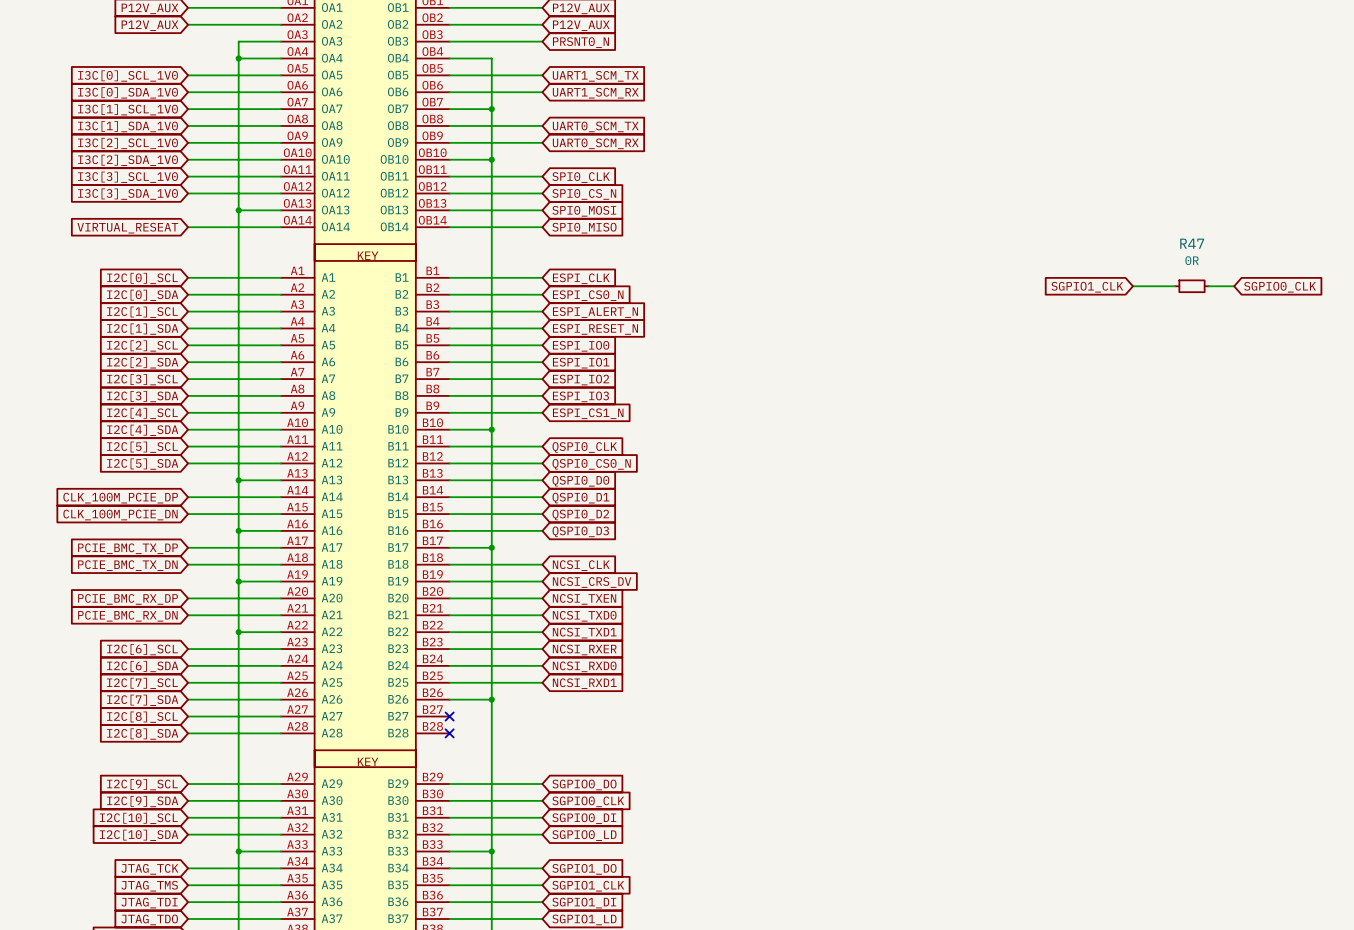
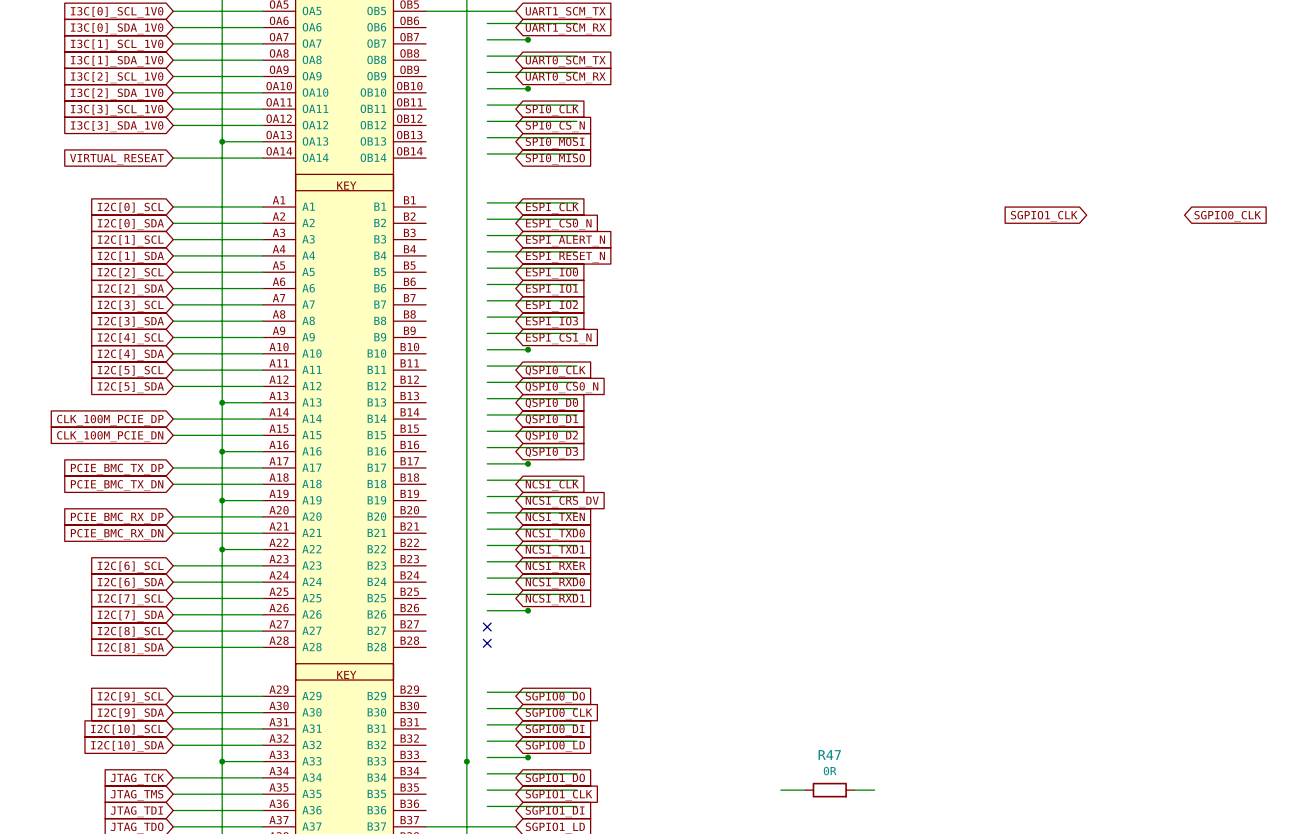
wire: (449, 92) (542, 92) -> (487, 23) (576, 23)
junction: none -> (528, 39)
wire: (449, 109) (491, 109) -> (487, 39) (528, 39)
junction: (491, 109) -> none
wire: (449, 125) (542, 125) -> (487, 56) (576, 56)
wire: (449, 142) (542, 142) -> (487, 72) (576, 72)
junction: none -> (528, 88)
wire: (449, 159) (491, 159) -> (487, 88) (528, 88)
junction: (491, 159) -> none
wire: (449, 176) (542, 176) -> (487, 105) (576, 105)
wire: (449, 193) (542, 193) -> (487, 121) (576, 121)
wire: (449, 210) (542, 210) -> (487, 137) (576, 137)
wire: (449, 227) (542, 227) -> (487, 153) (576, 153)
wire: (449, 277) (542, 277) -> (487, 202) (576, 202)
R47 symbol: [1175, 279, 1209, 294] -> [805, 782, 855, 798]
wire: (1132, 286) (1175, 286) -> none
wire: (1208, 286) (1234, 286) -> none
wire: (449, 294) (542, 294) -> (487, 219) (576, 219)
wire: (449, 311) (542, 311) -> (487, 235) (576, 235)
wire: (449, 328) (542, 328) -> (487, 251) (576, 251)
wire: (449, 345) (542, 345) -> (487, 268) (576, 268)
wire: (449, 362) (542, 362) -> (487, 284) (576, 284)
wire: (449, 379) (542, 379) -> (487, 300) (576, 300)
wire: (449, 395) (542, 395) -> (487, 317) (576, 317)
wire: (449, 412) (542, 412) -> (487, 333) (576, 333)
junction: none -> (528, 349)
wire: (449, 429) (491, 429) -> (487, 349) (528, 349)
junction: (491, 429) -> none
wire: (449, 446) (542, 446) -> (487, 366) (576, 366)
wire: (449, 463) (542, 463) -> (487, 382) (576, 382)
wire: (449, 480) (542, 480) -> (487, 398) (576, 398)
wire: (449, 497) (542, 497) -> (487, 414) (576, 414)
wire: (449, 514) (542, 514) -> (487, 431) (576, 431)
wire: (449, 530) (542, 530) -> (487, 447) (576, 447)
junction: none -> (528, 463)
wire: (449, 547) (491, 547) -> (487, 463) (528, 463)
junction: (491, 547) -> none
wire: (449, 564) (542, 564) -> (487, 480) (576, 480)
wire: (449, 581) (542, 581) -> (487, 496) (576, 496)
wire: (449, 598) (542, 598) -> (487, 512) (576, 512)
wire: (449, 615) (542, 615) -> (487, 529) (576, 529)
wire: (449, 632) (542, 632) -> (487, 545) (576, 545)
wire: (449, 649) (542, 649) -> (487, 561) (576, 561)
wire: (449, 665) (542, 665) -> (487, 578) (576, 578)
wire: (449, 682) (542, 682) -> (487, 594) (576, 594)
junction: none -> (528, 610)
wire: (449, 699) (491, 699) -> (487, 610) (528, 610)
junction: (491, 699) -> none
no-connect mark: none -> (487, 627)
no-connect mark: (449, 716) -> none
no-connect mark: none -> (487, 643)
no-connect mark: (449, 733) -> none
wire: (449, 784) (542, 784) -> (487, 692) (576, 692)
wire: (449, 800) (542, 800) -> (487, 708) (576, 708)
wire: (449, 817) (542, 817) -> (487, 724) (576, 724)
wire: (449, 834) (542, 834) -> (487, 741) (576, 741)
junction: none -> (528, 757)
wire: (449, 851) (491, 851) -> (487, 757) (528, 757)
wire: (449, 868) (542, 868) -> (487, 773) (576, 773)
wire: none -> (780, 790) (805, 790)
wire: none -> (854, 790) (874, 790)
wire: (449, 885) (542, 885) -> (487, 790) (576, 790)
wire: (449, 902) (542, 902) -> (487, 806) (576, 806)

